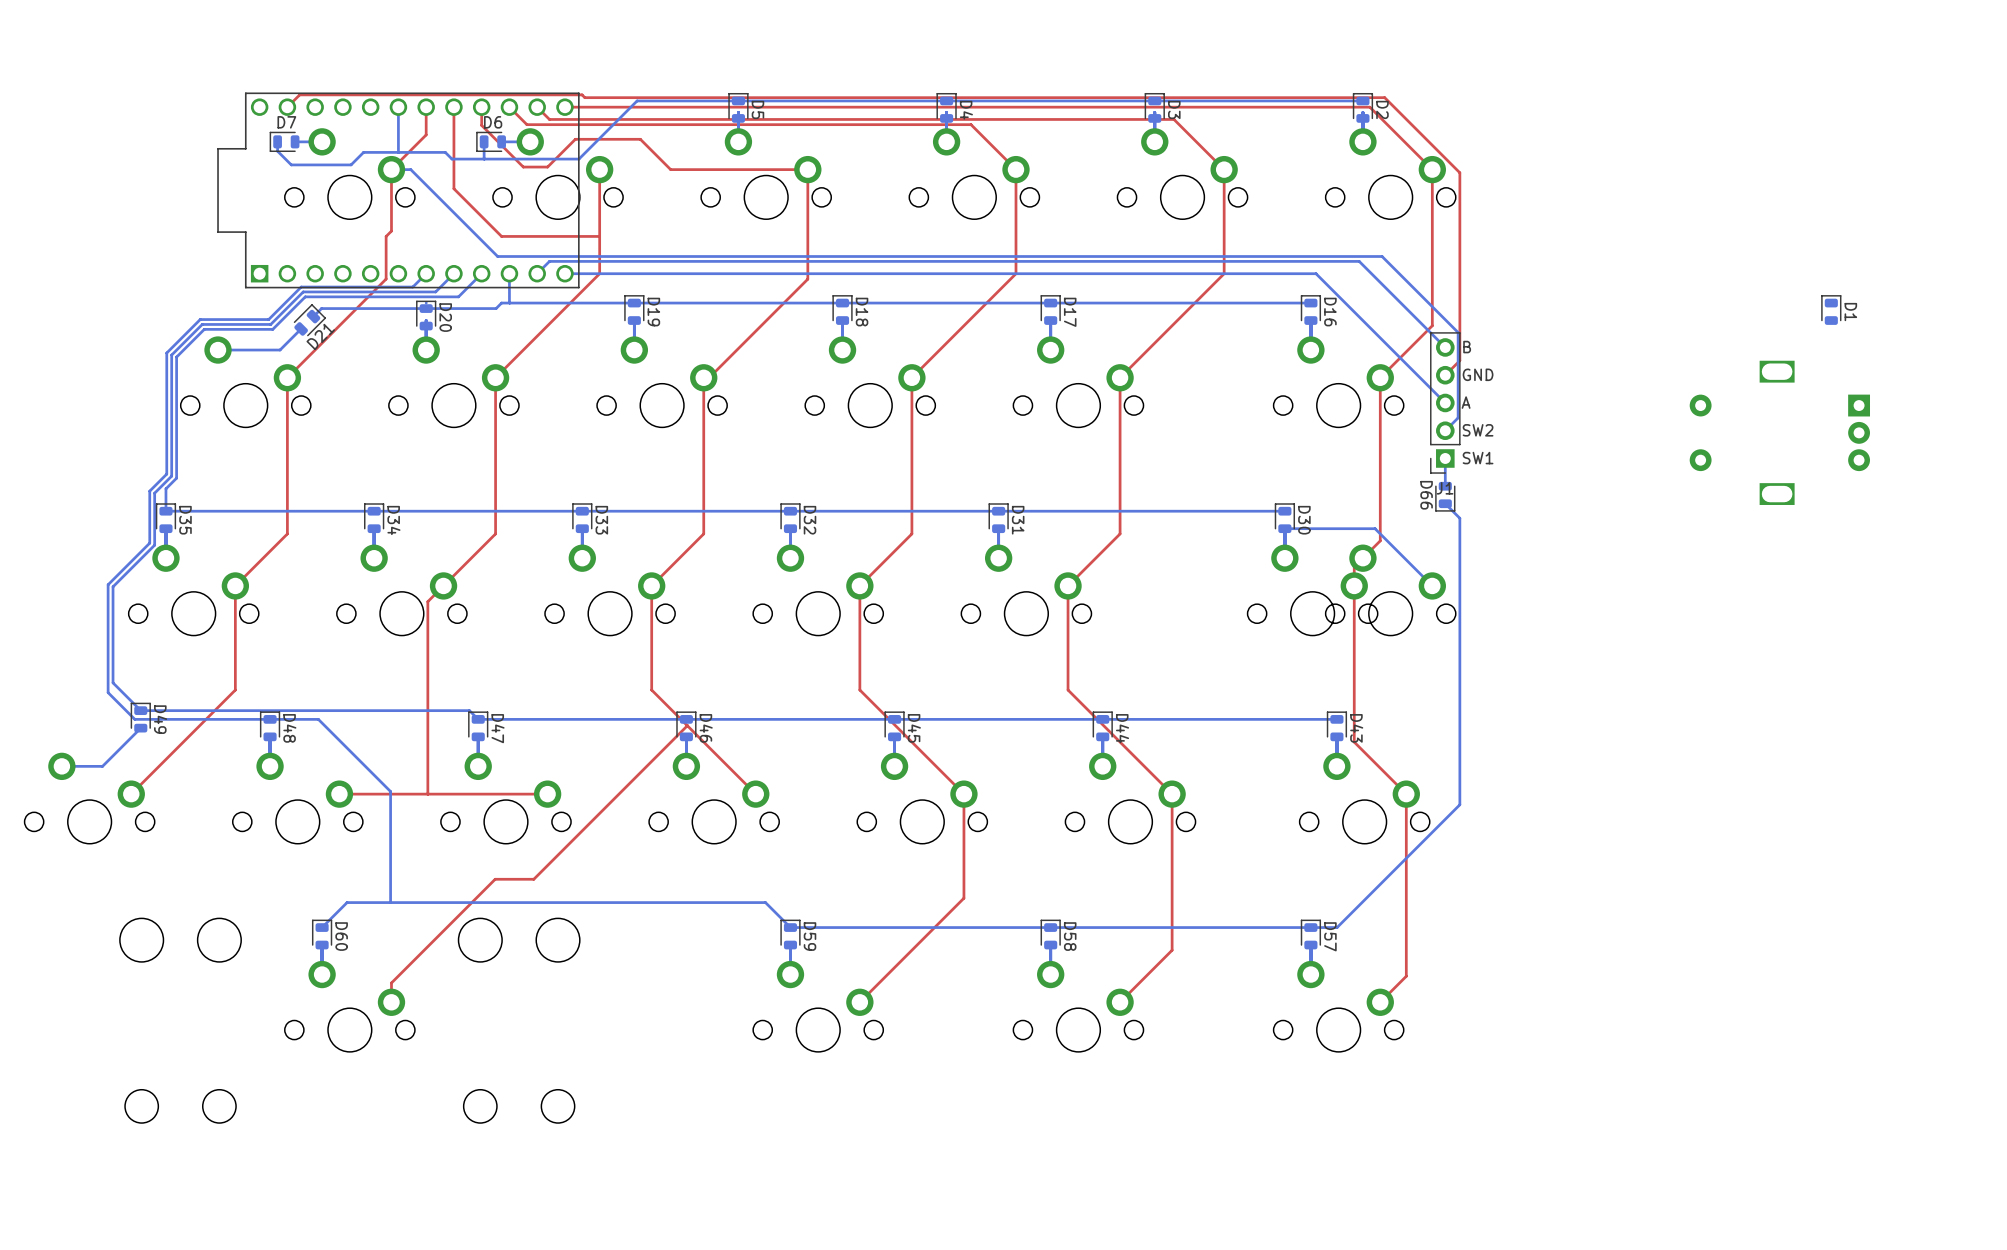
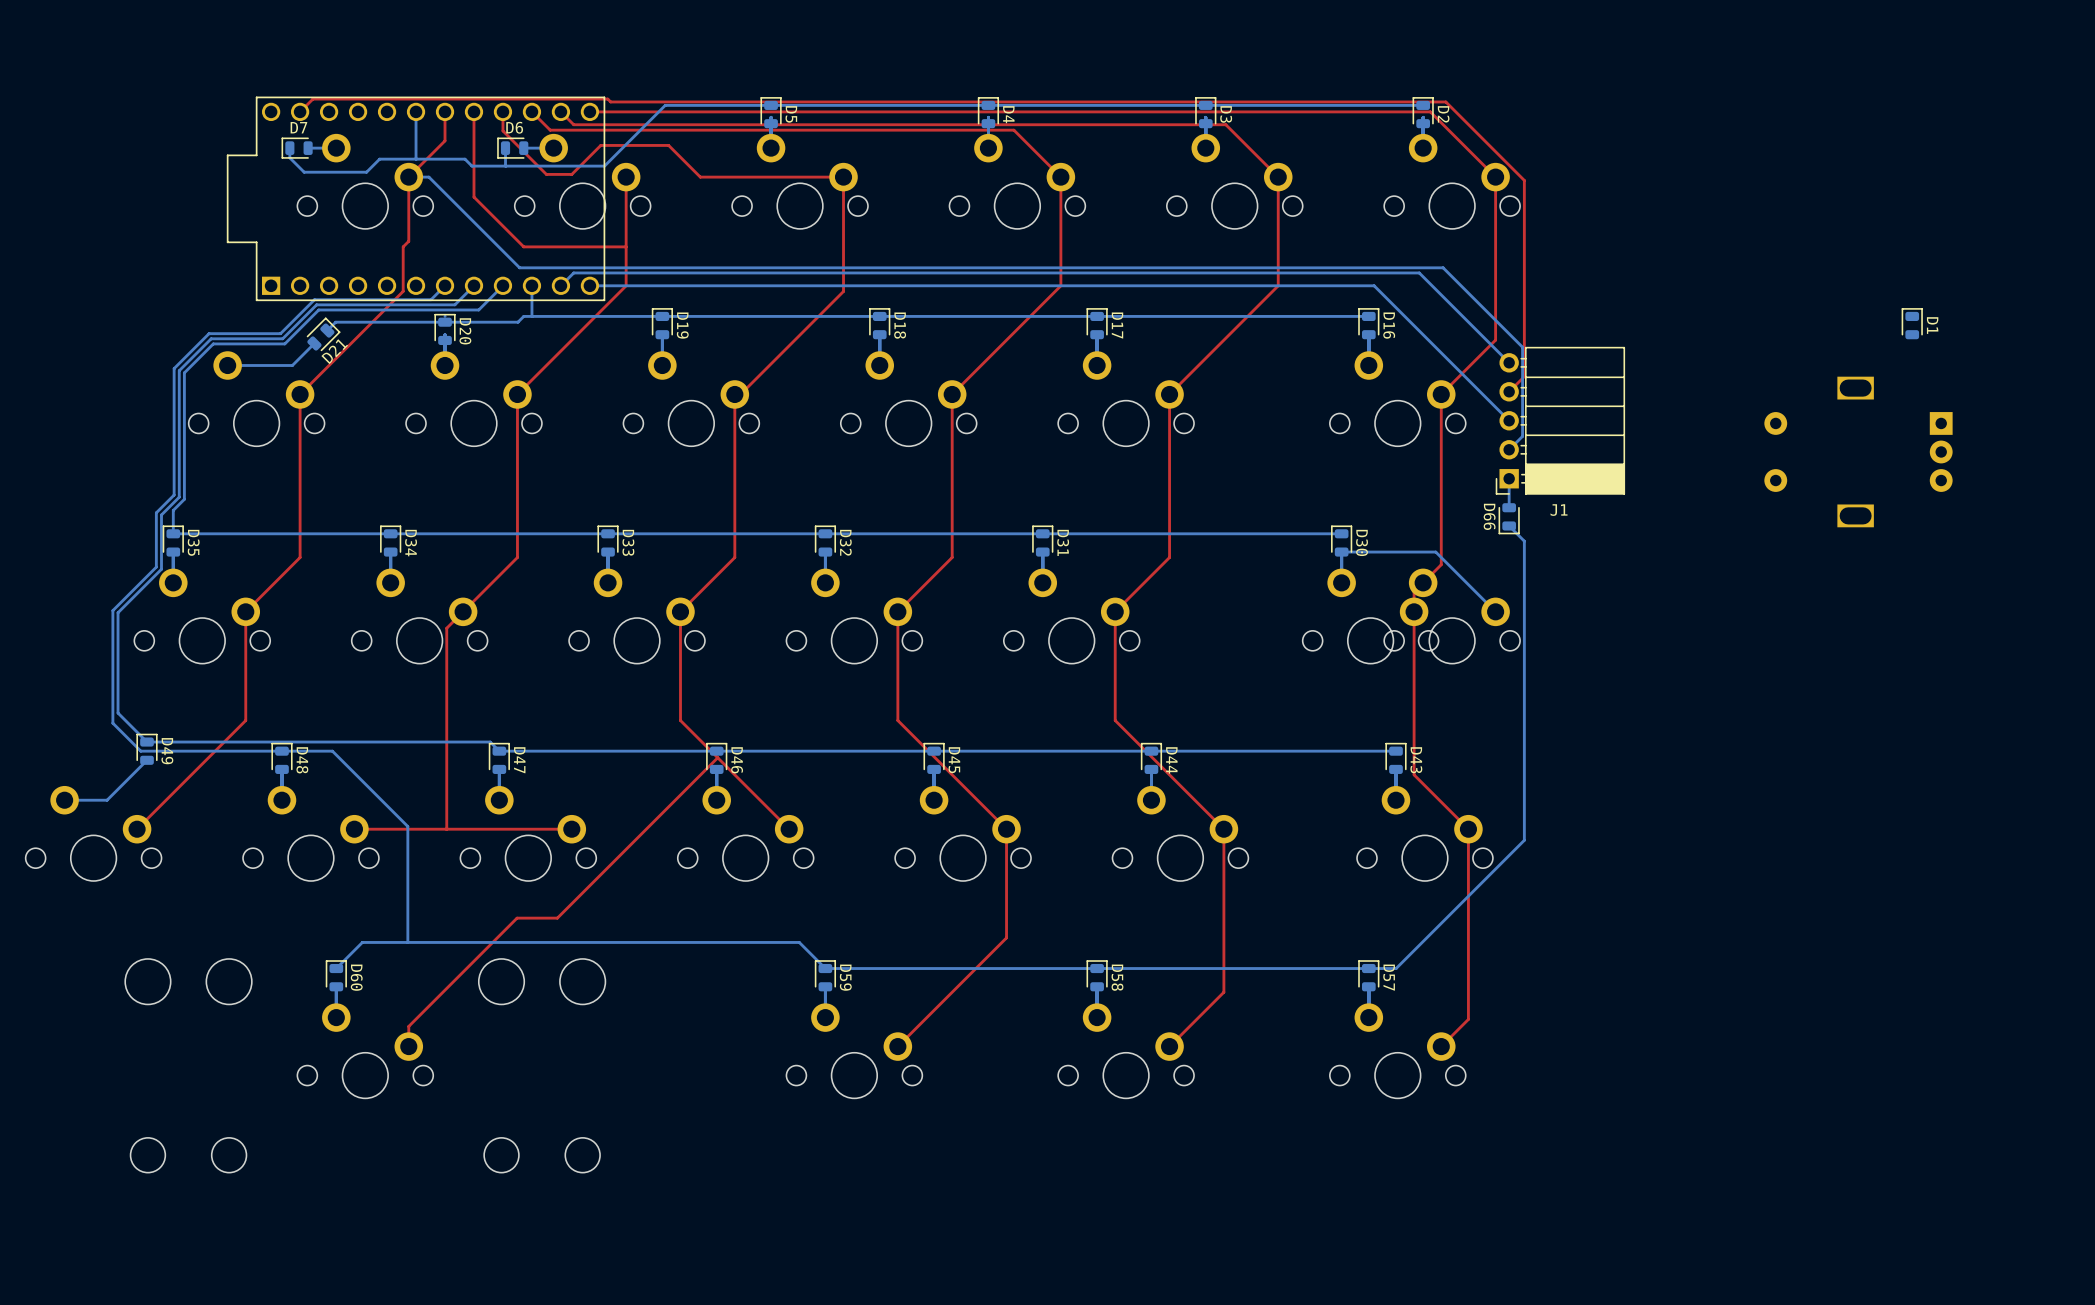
J1 footprint: [1430, 332, 1461, 474] -> [1495, 346, 1625, 495]
text: B (1467, 347) -> none
text: GND (1478, 374) -> none
text: A (1466, 402) -> none
text: SW2 (1478, 430) -> none
text: SW1 (1478, 458) -> none

